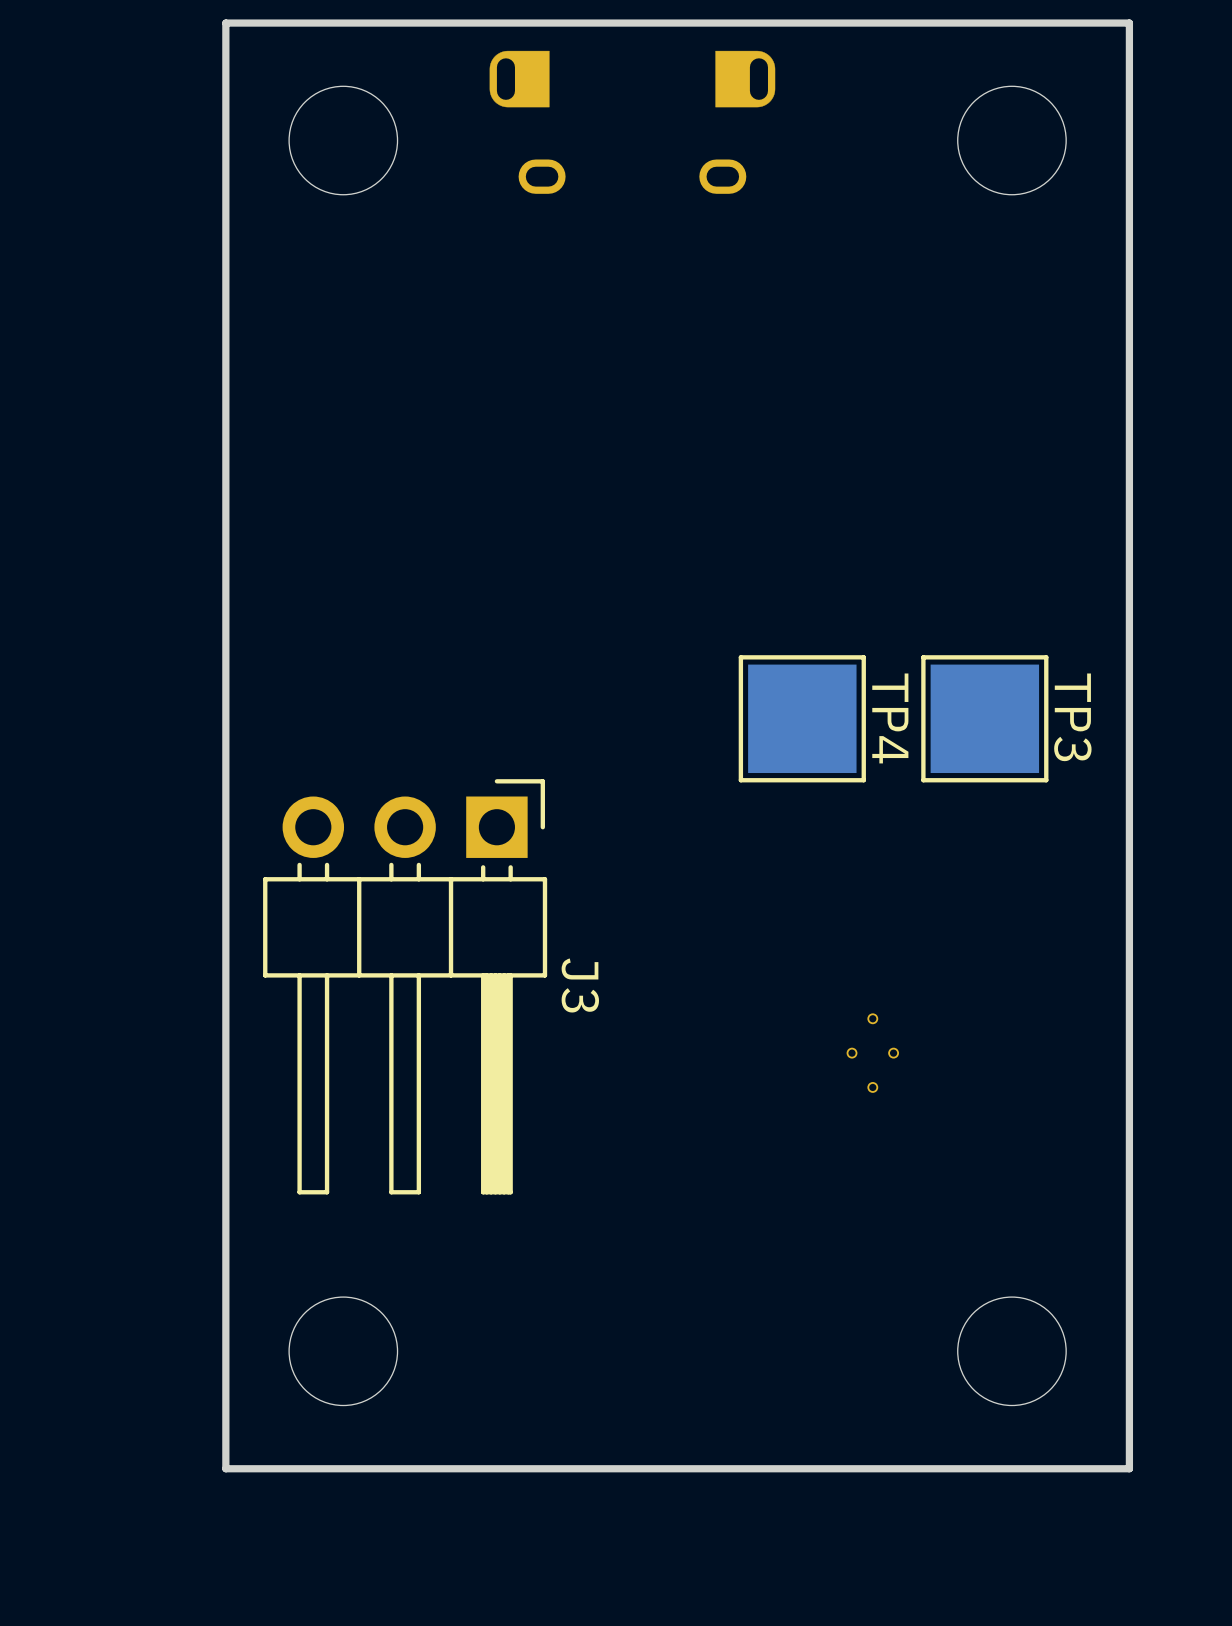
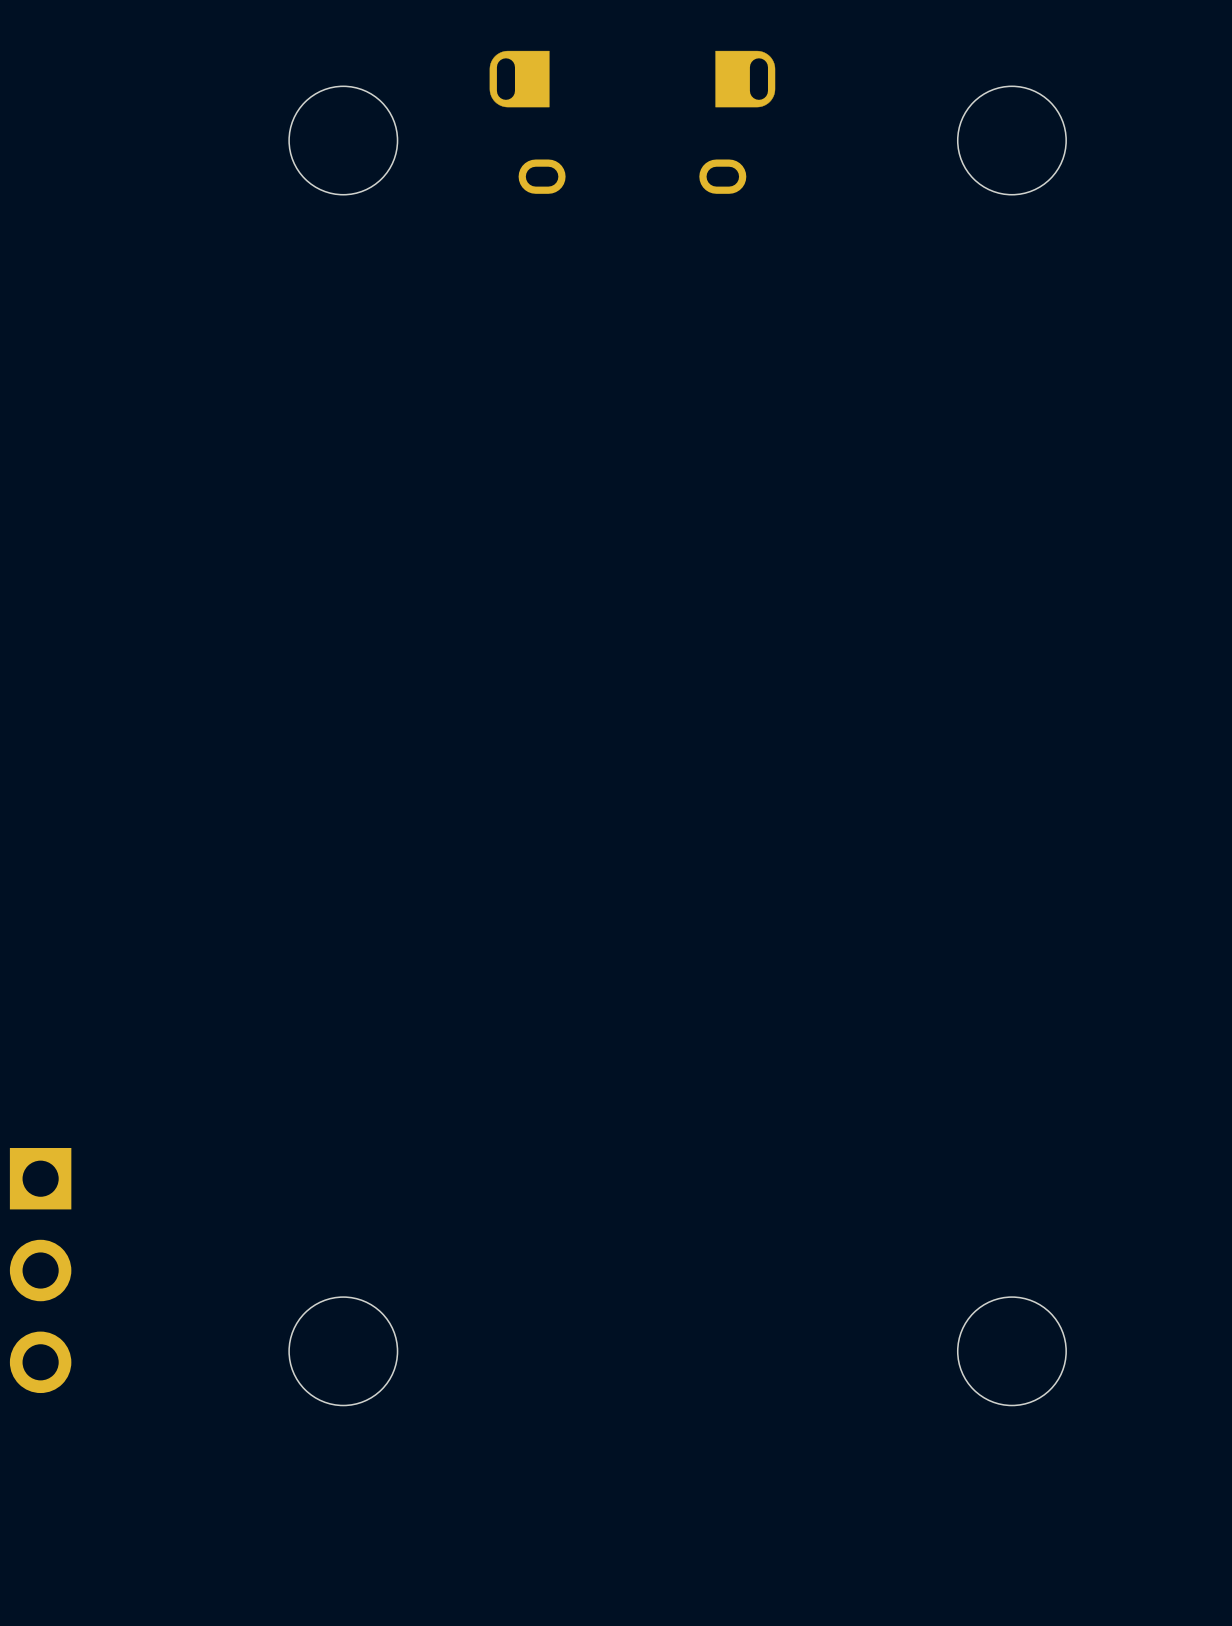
board edge: (1129, 23) (225, 23) (225, 1468) (1129, 1468) (1129, 23) -> none
TP4: (802, 718) -> none
TP3: (984, 718) -> none
J3 side: bottom (405, 986) -> top (40, 1270)
part: (872, 1053) -> none

